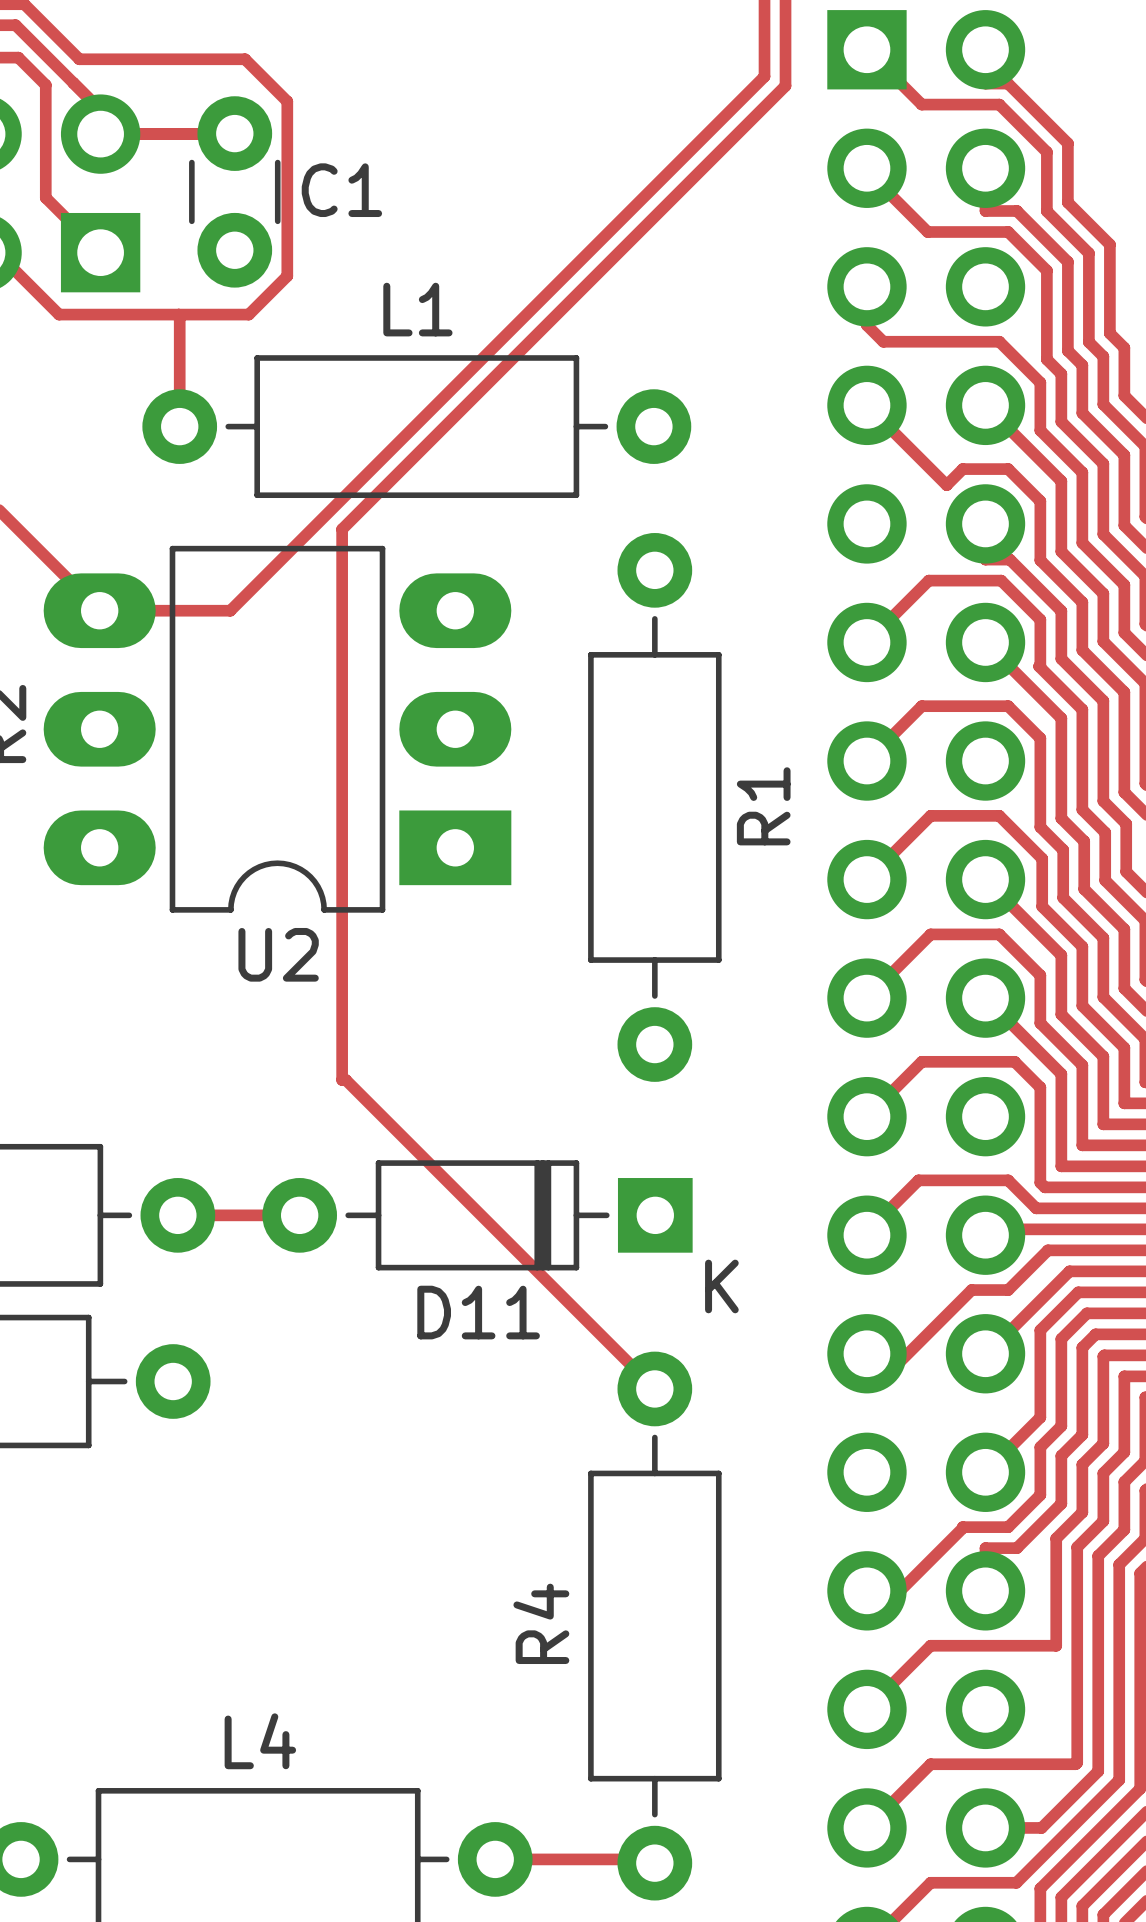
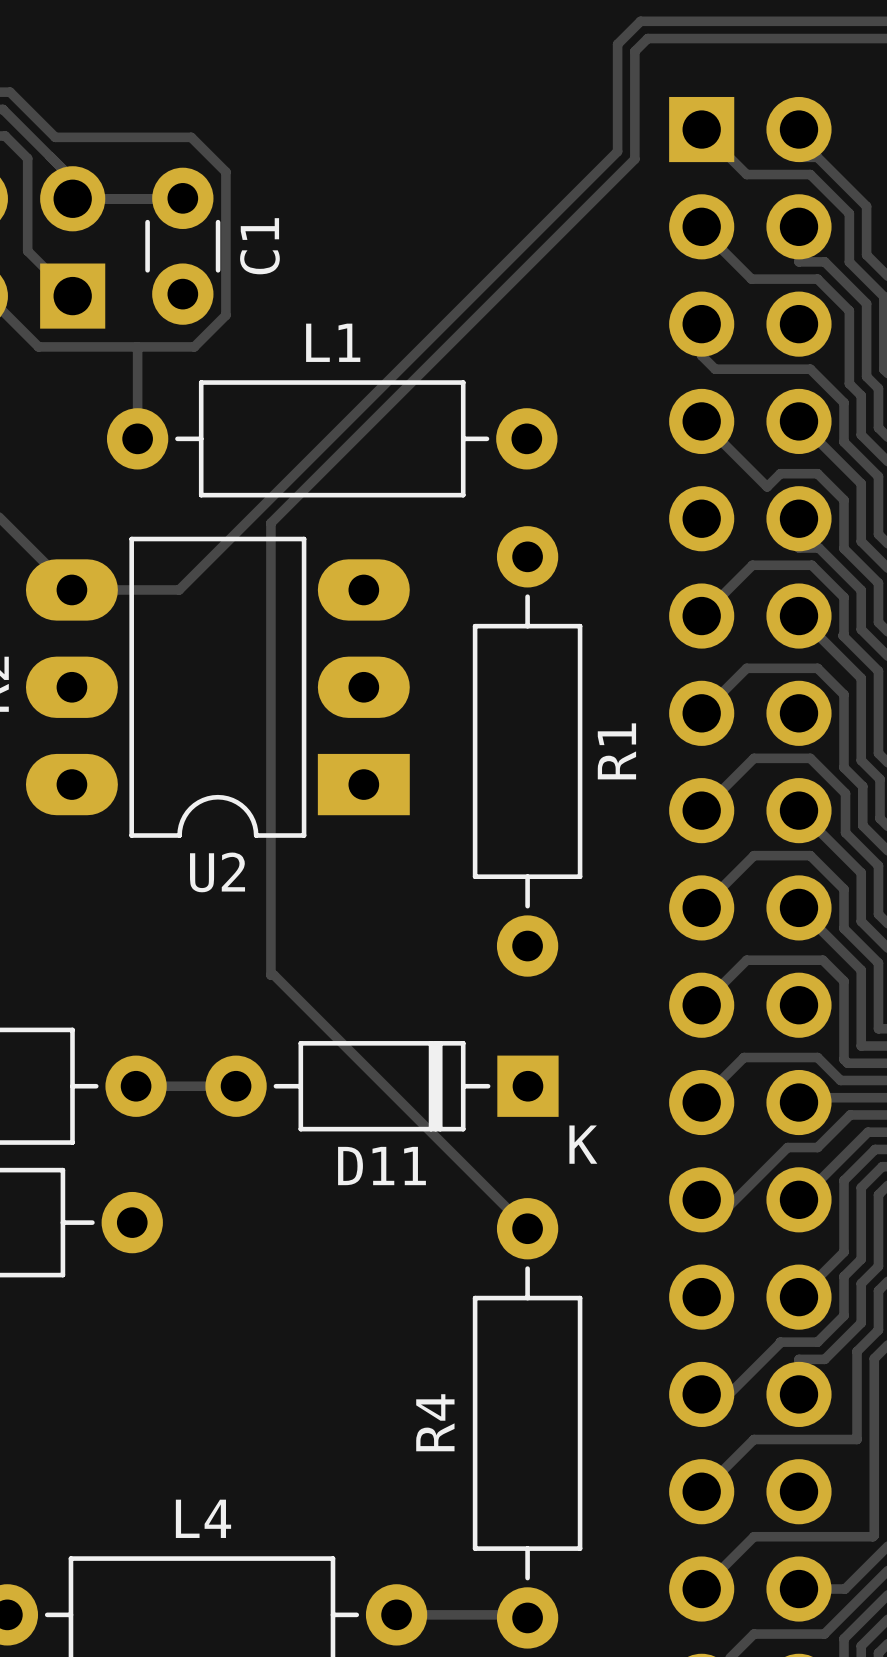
C1 name rotation: 0° (341, 190) -> 90° counterclockwise (259, 246)

